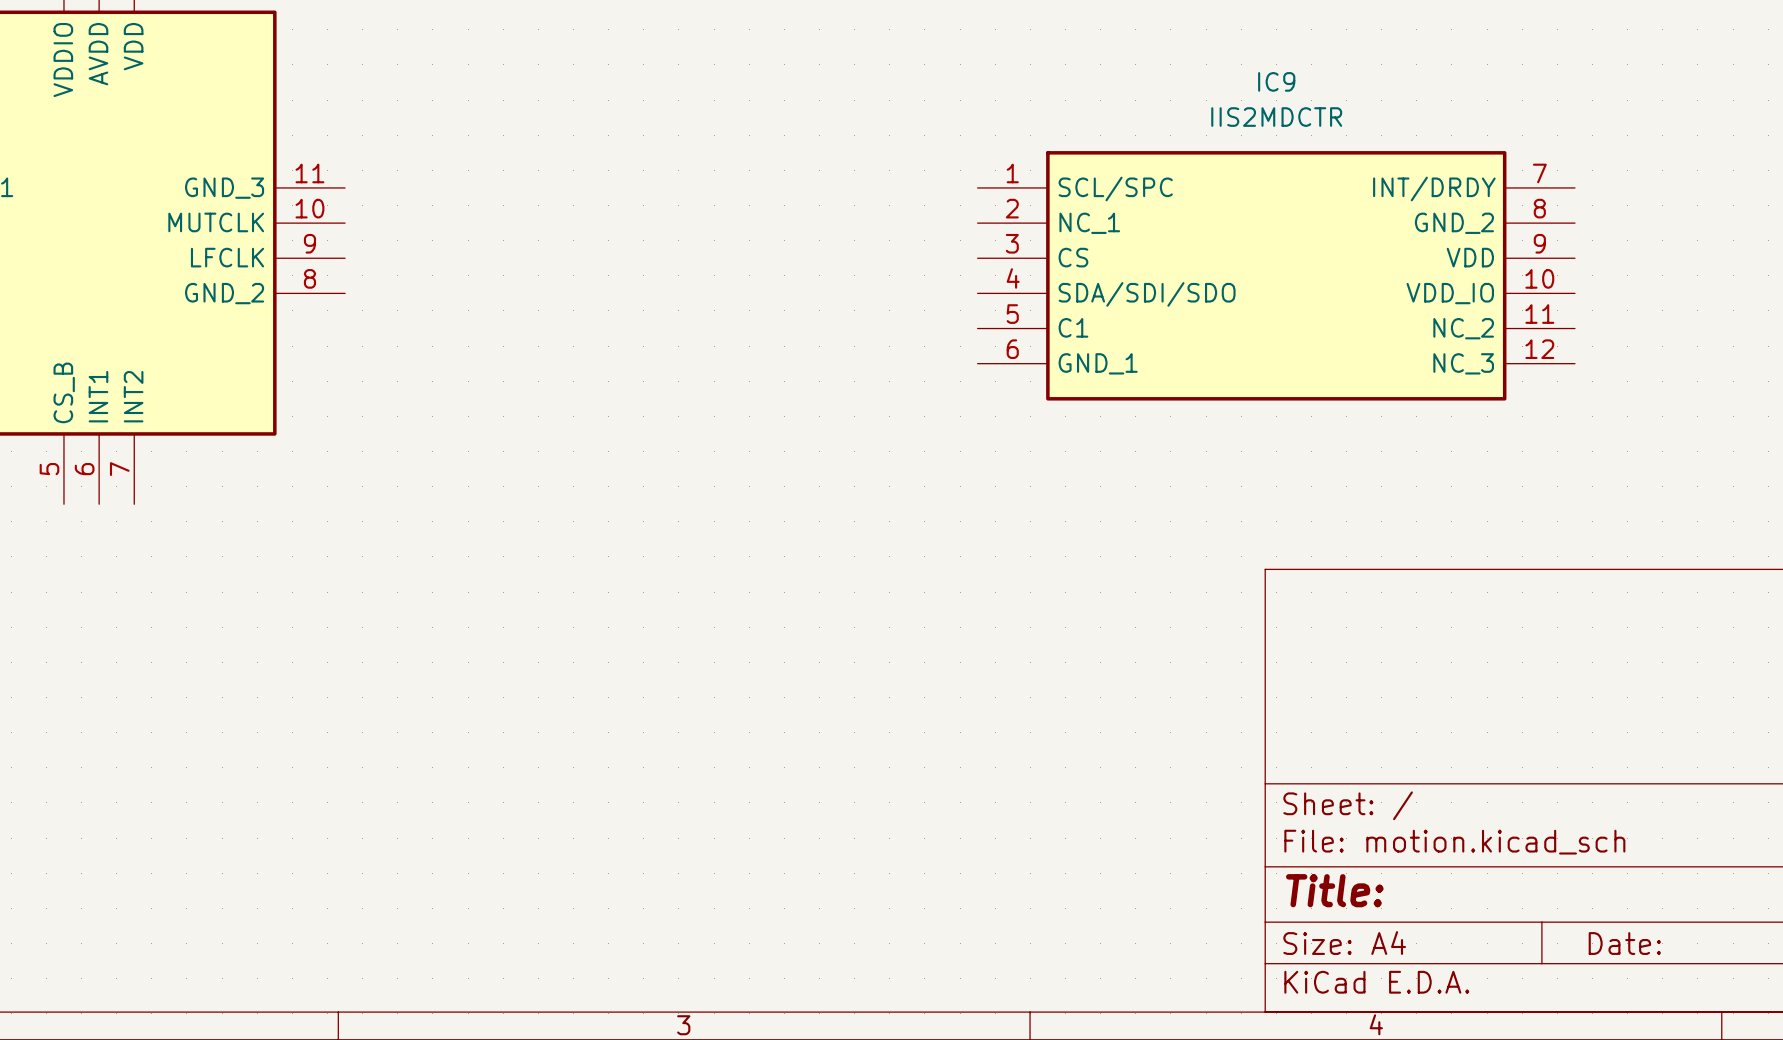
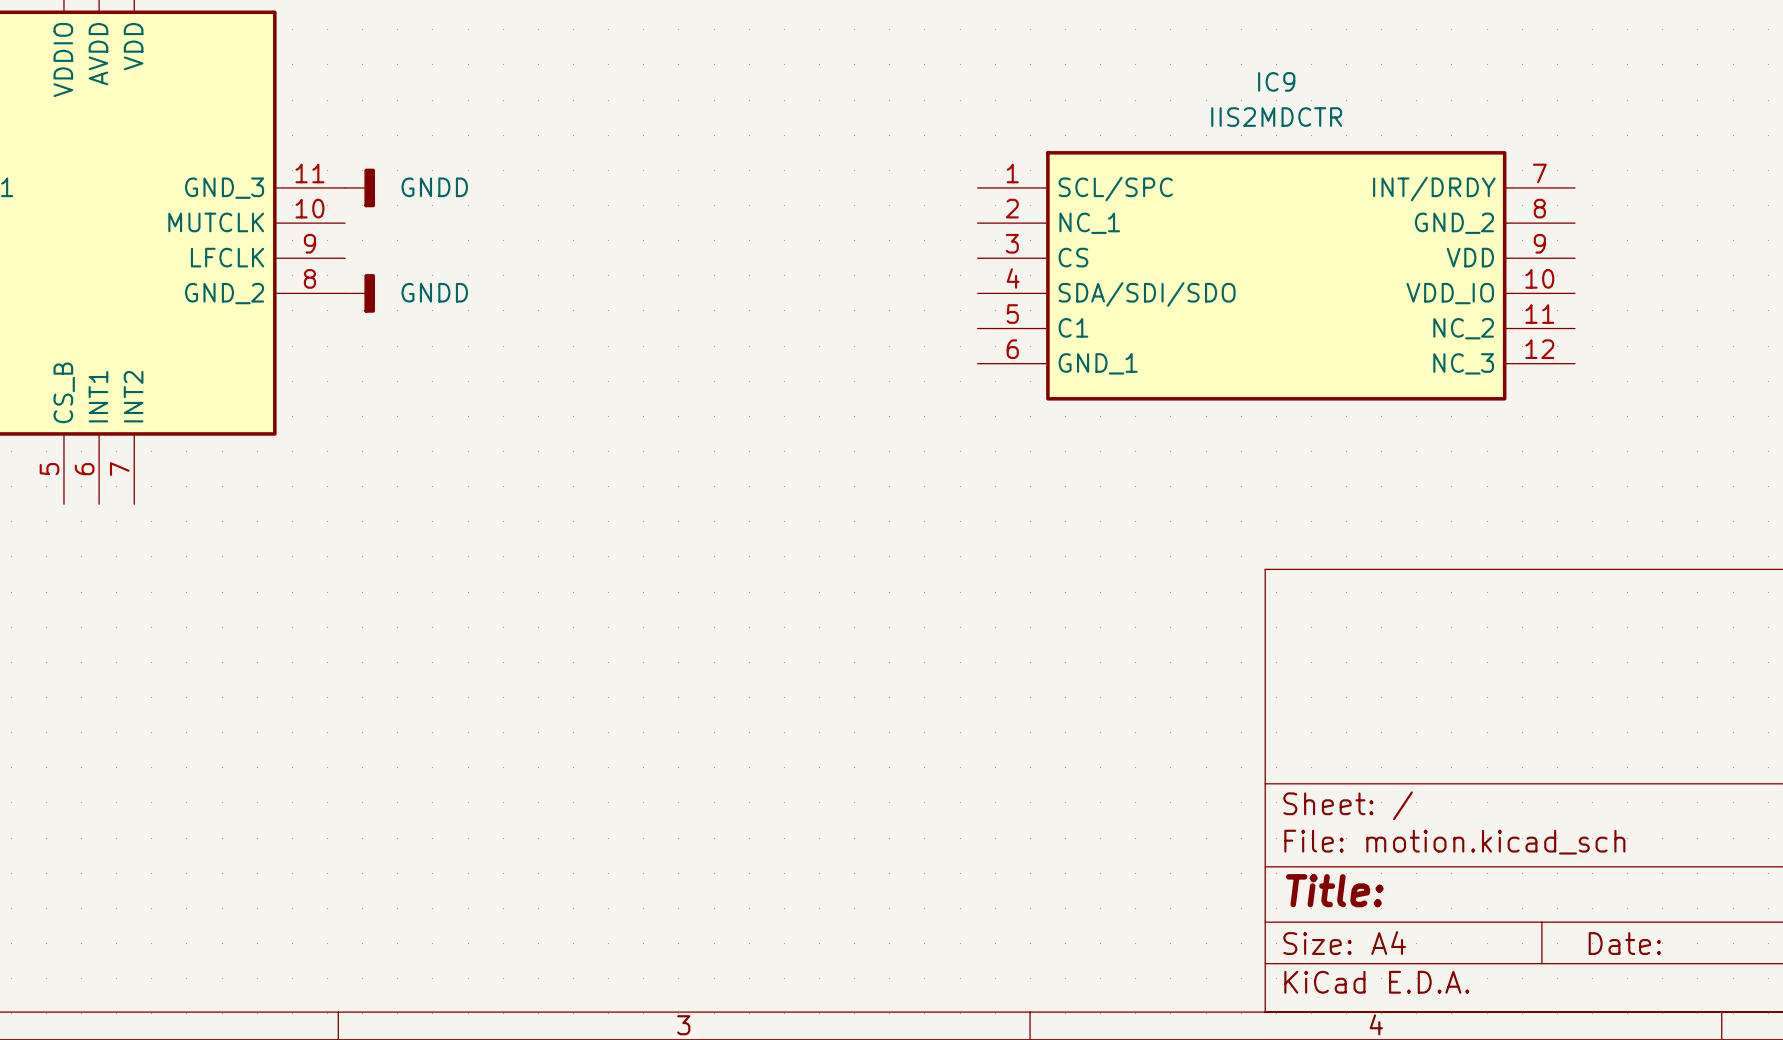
power symbol: none -> GNDD (360, 187)
power symbol: none -> GNDD (360, 293)

